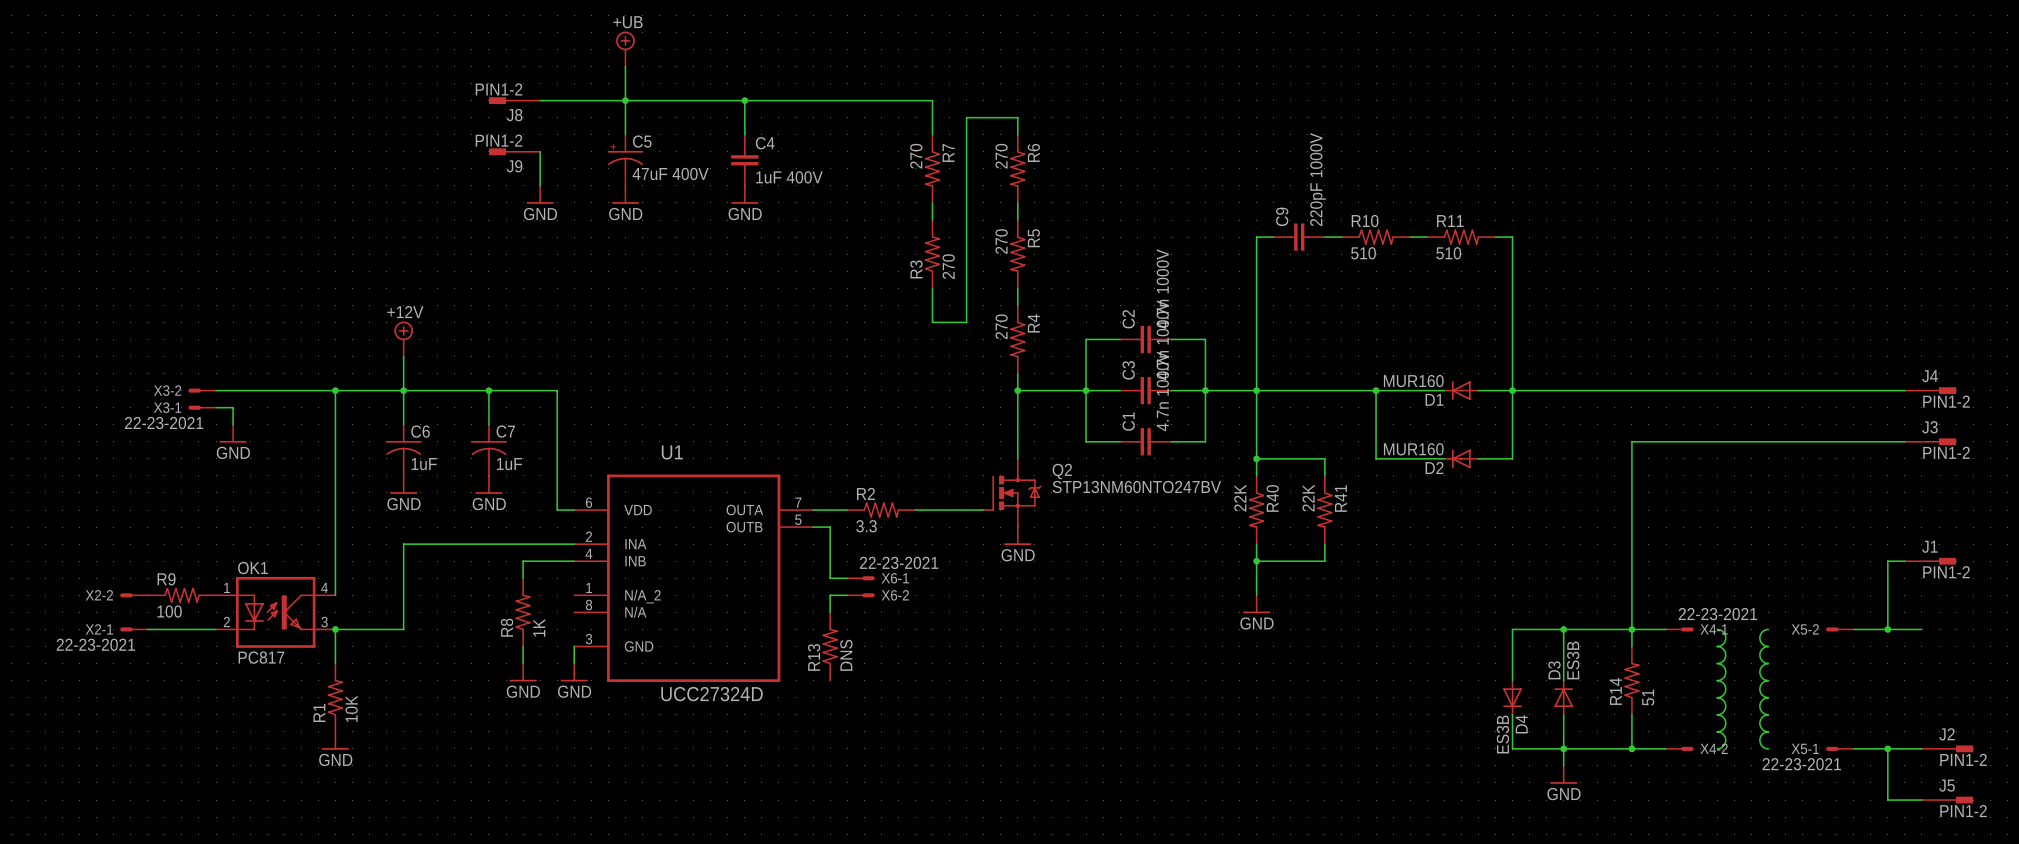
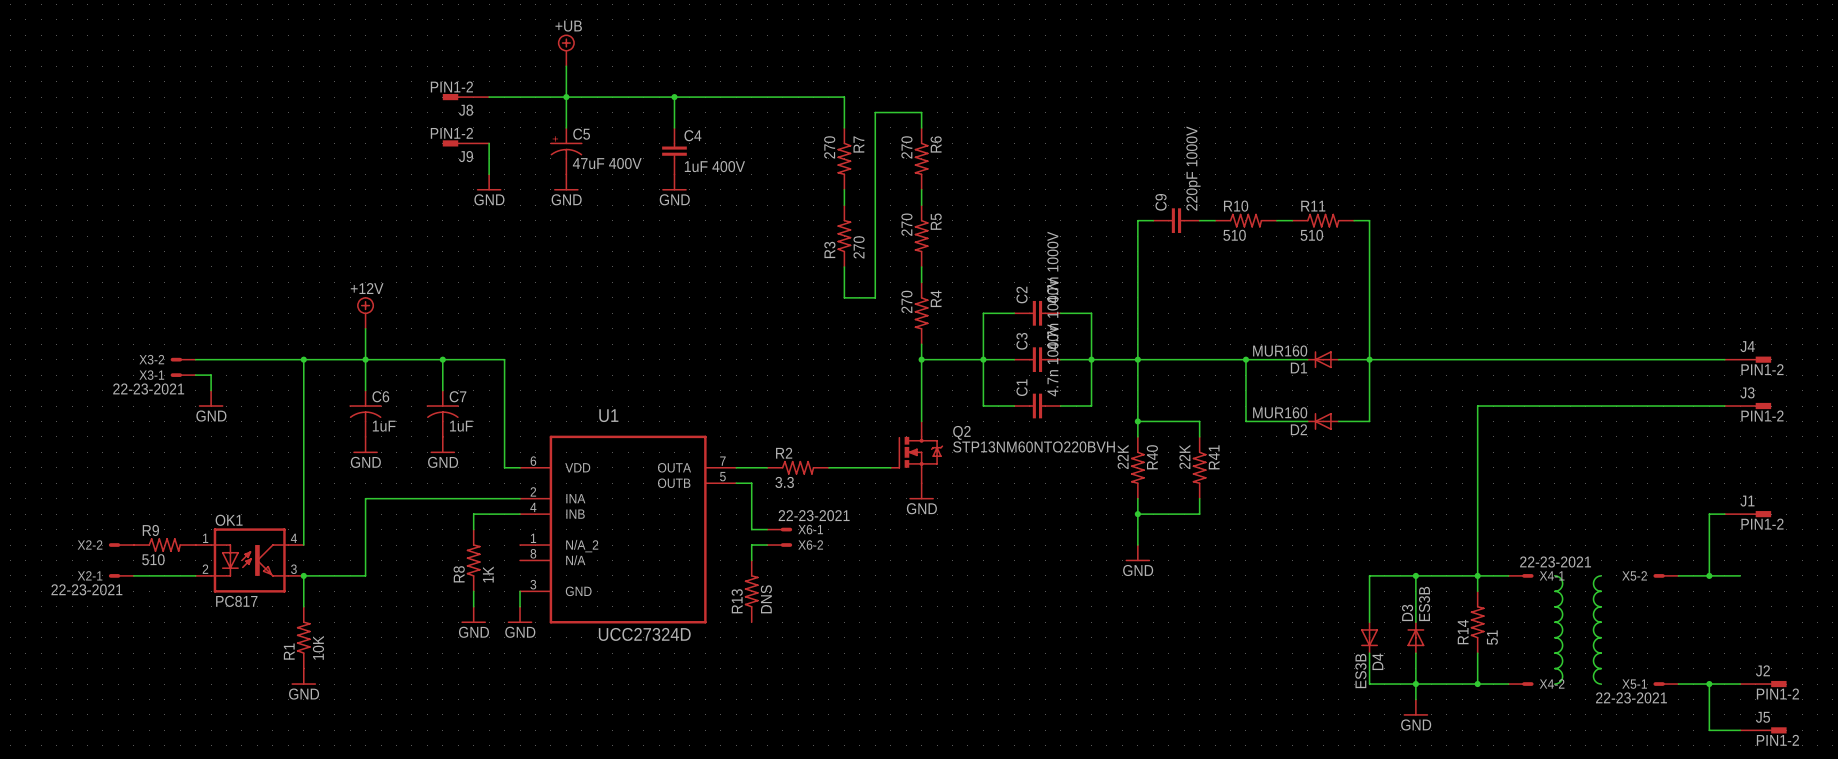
Q2 value: STP13NM60NTO247BV (1136, 487) -> STP13NM60NTO220BVH (1034, 446)
R9 value: 100 (169, 611) -> 510 (153, 559)

